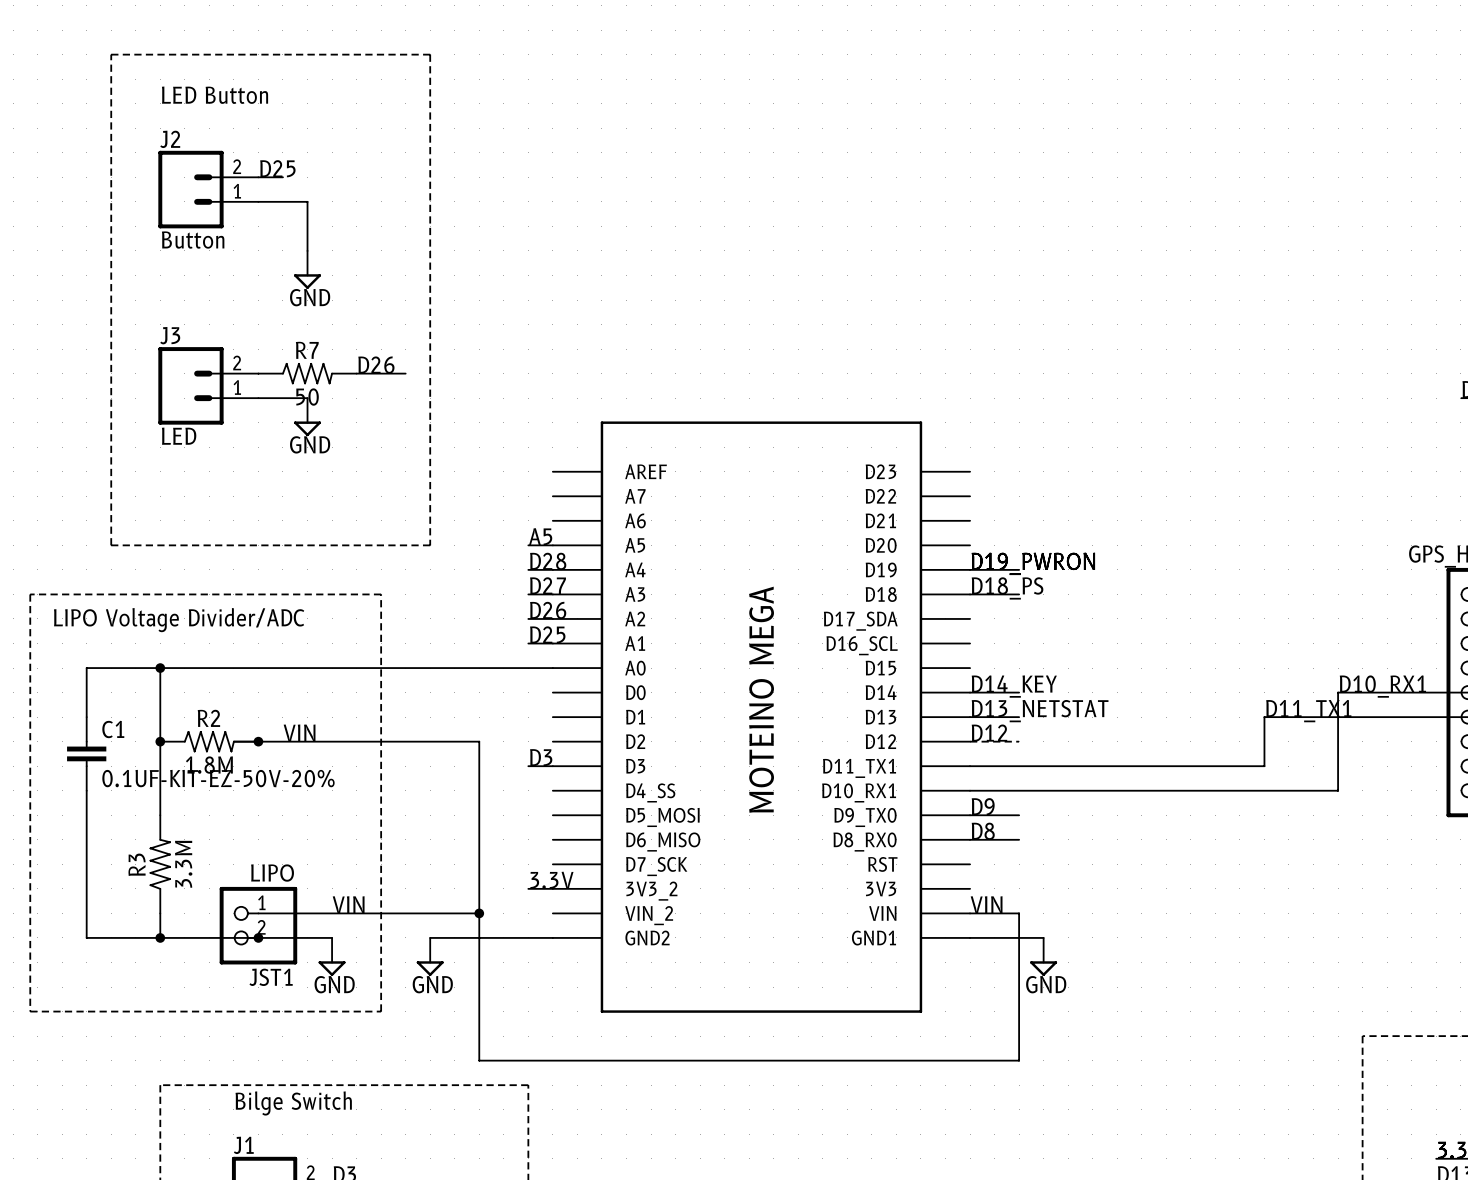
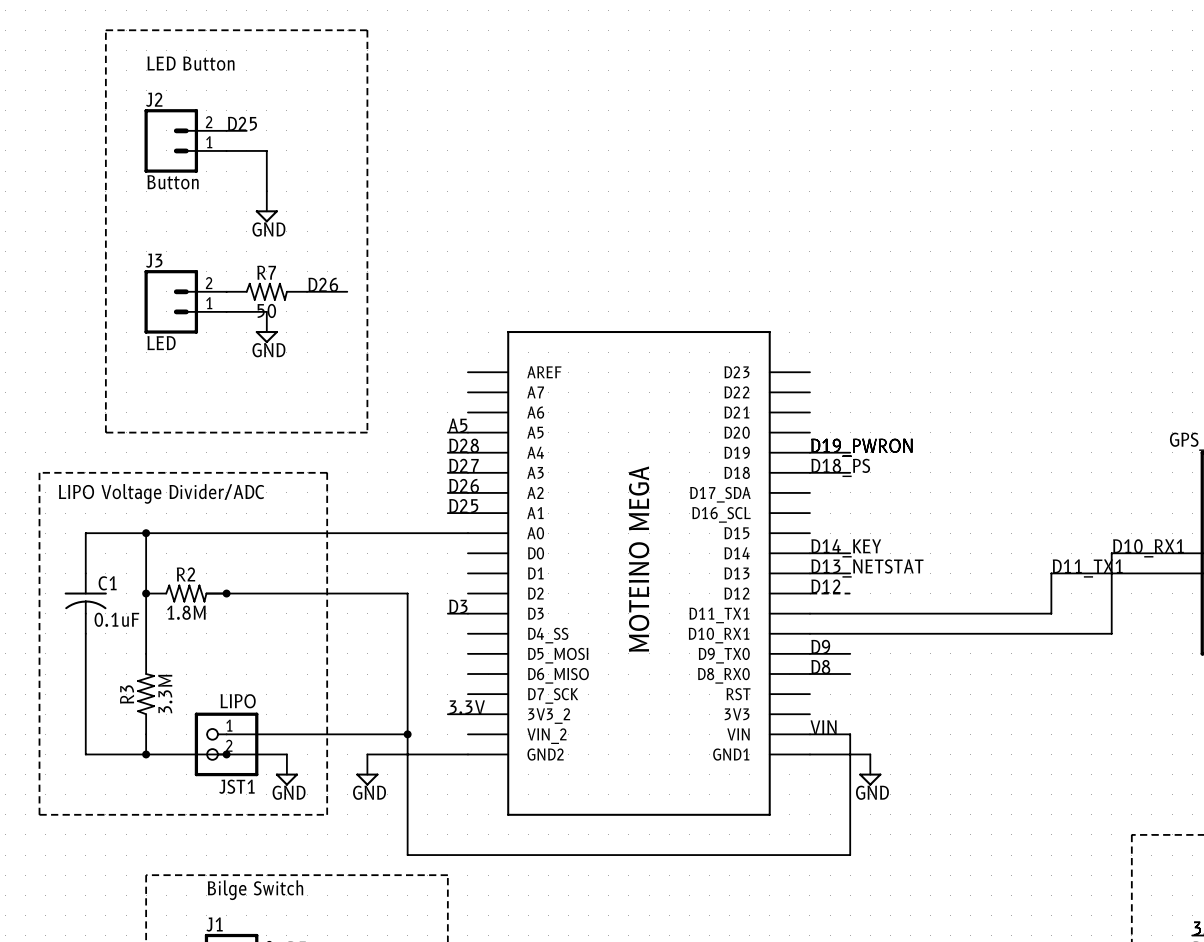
C1 symbol: [67, 717, 107, 791] -> [64, 573, 107, 634]
label: VIN (299, 733) -> none
C1 value: 0.1UF-KIT-EZ-50V-20% (218, 778) -> 0.1uF (116, 619)
label: VIN (348, 904) -> none

